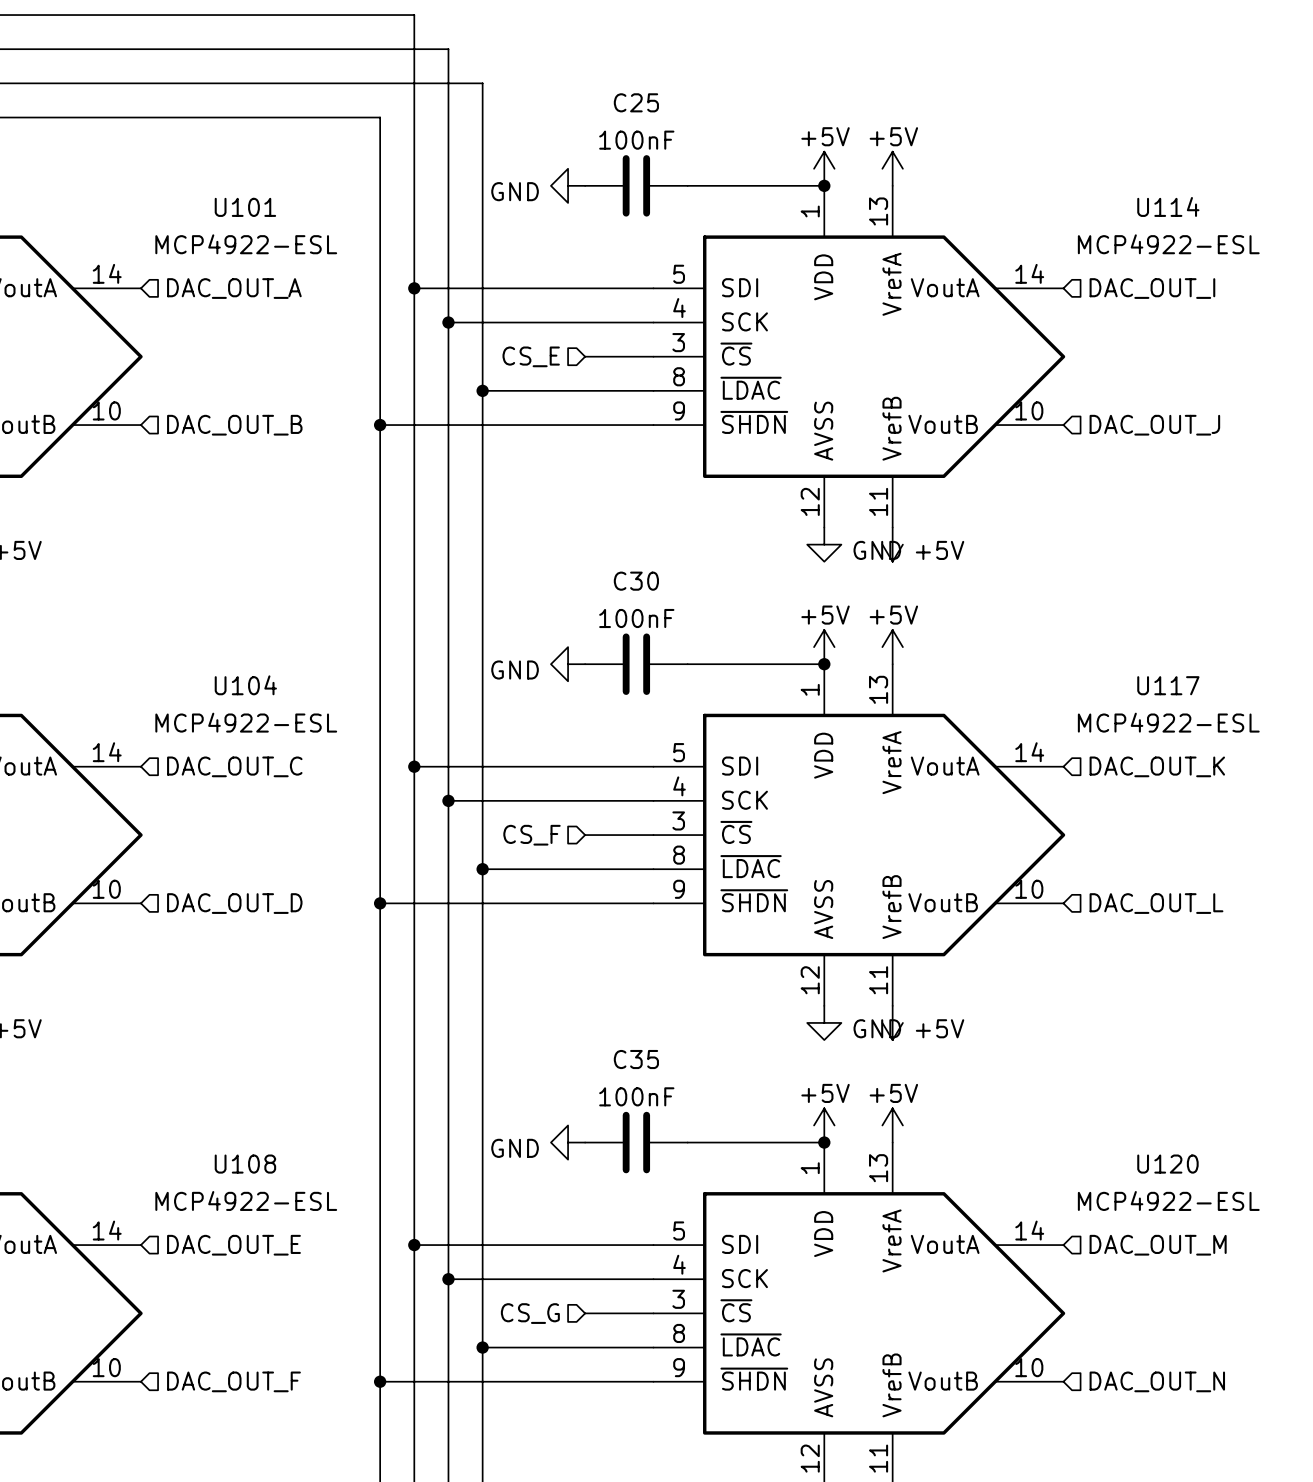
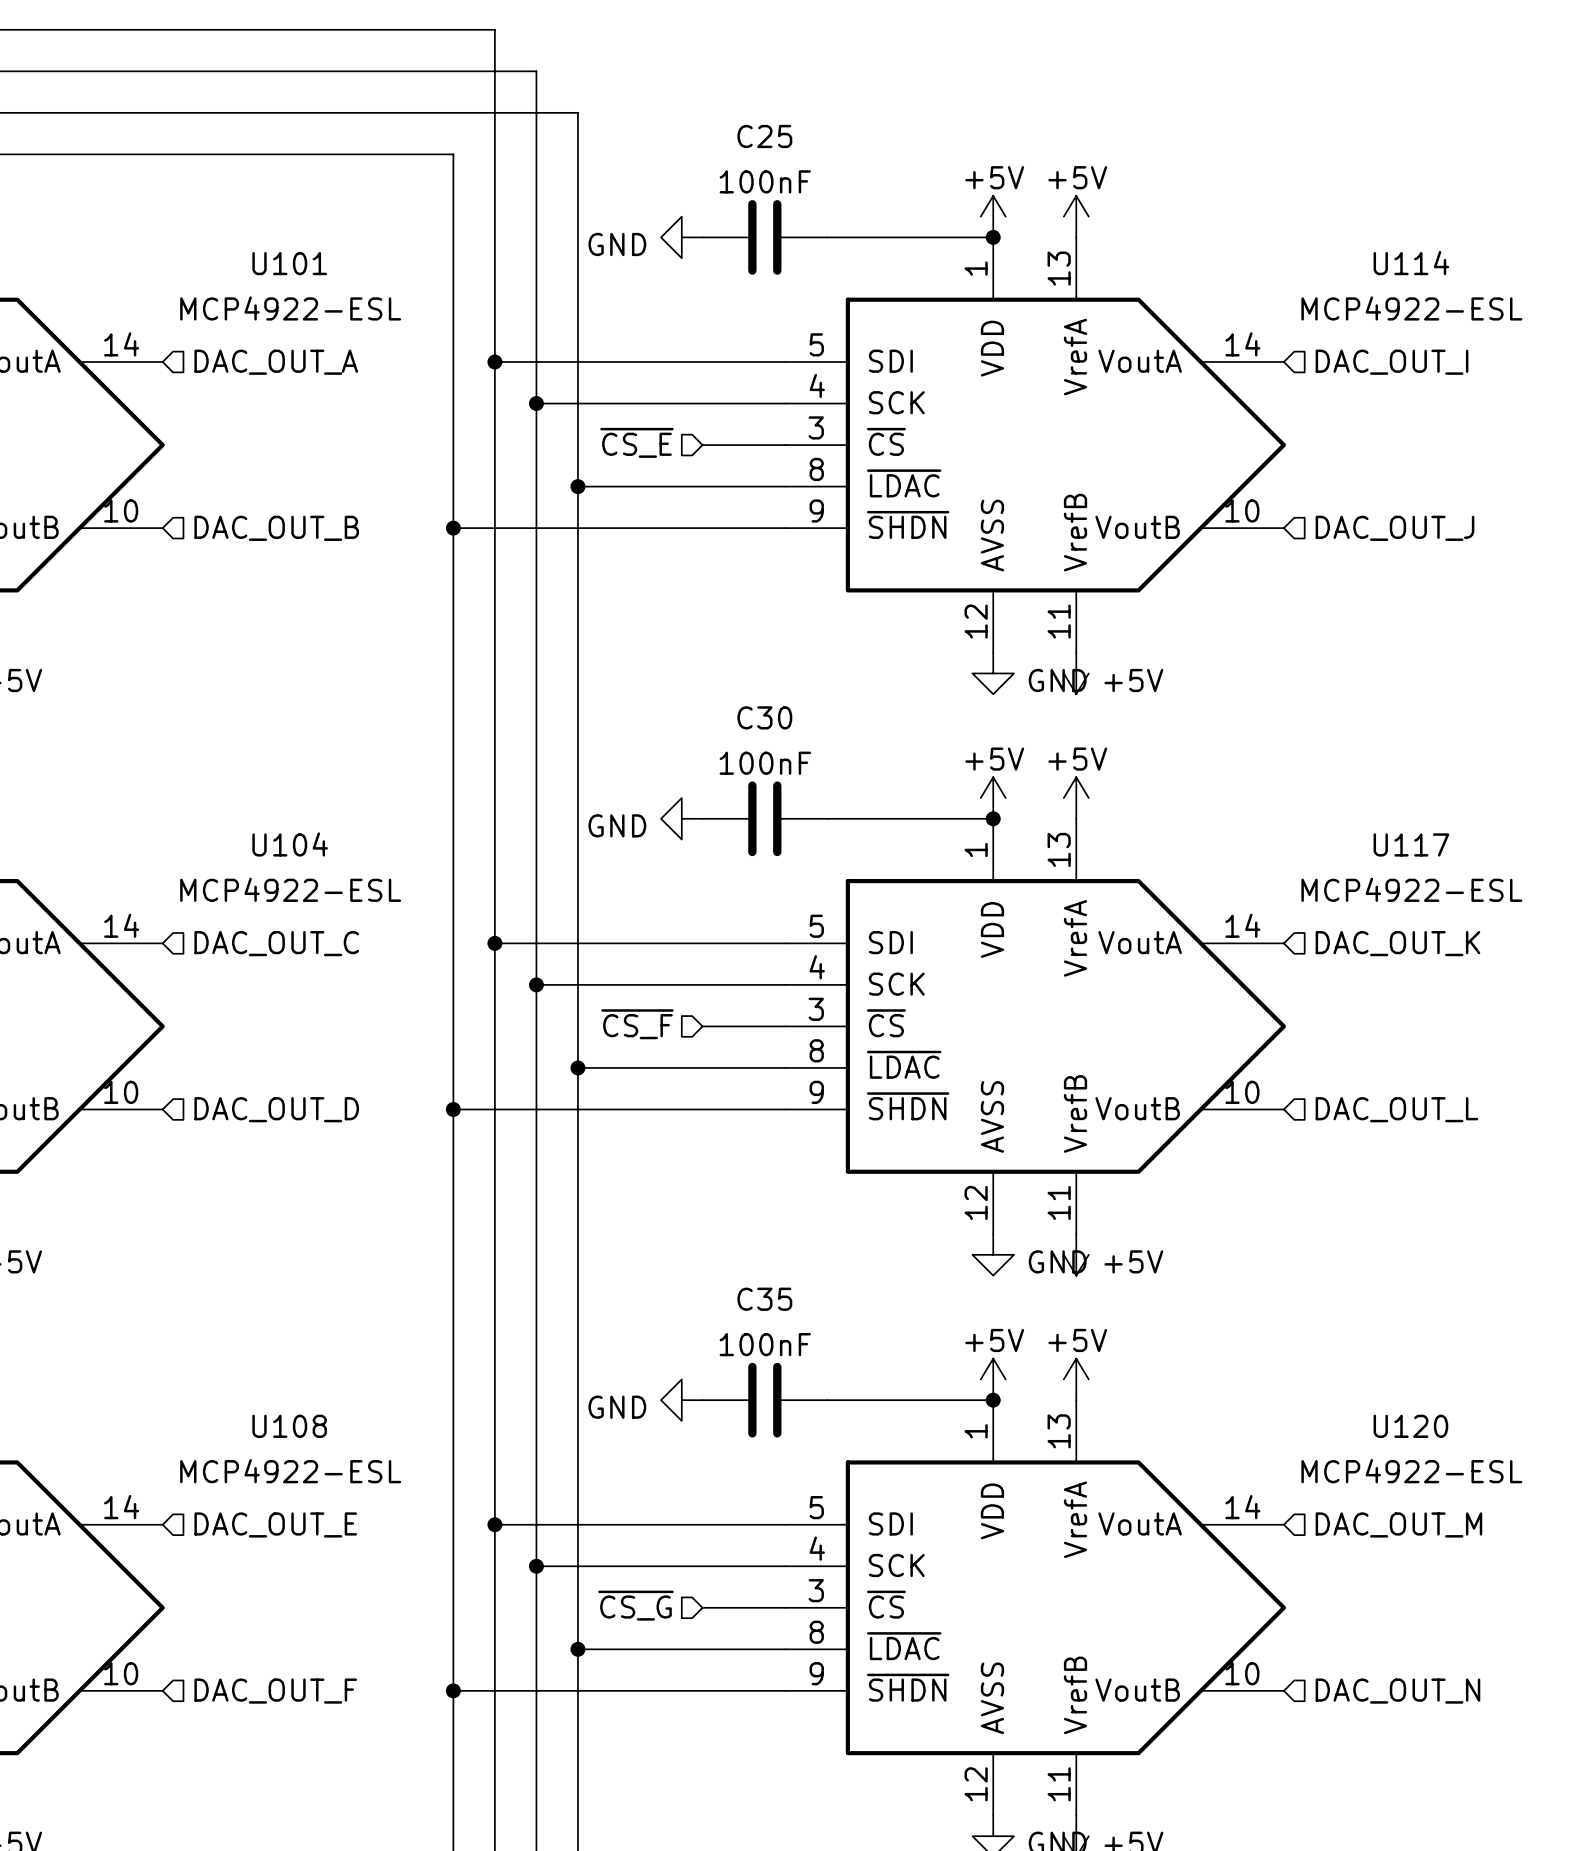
hierarchical label: CS_E (531, 356) -> ~{CS_E} (636, 442)
hierarchical label: CS_F (531, 835) -> ~{CS_F} (637, 1024)
hierarchical label: CS_G (530, 1313) -> ~{CS_G} (635, 1605)

